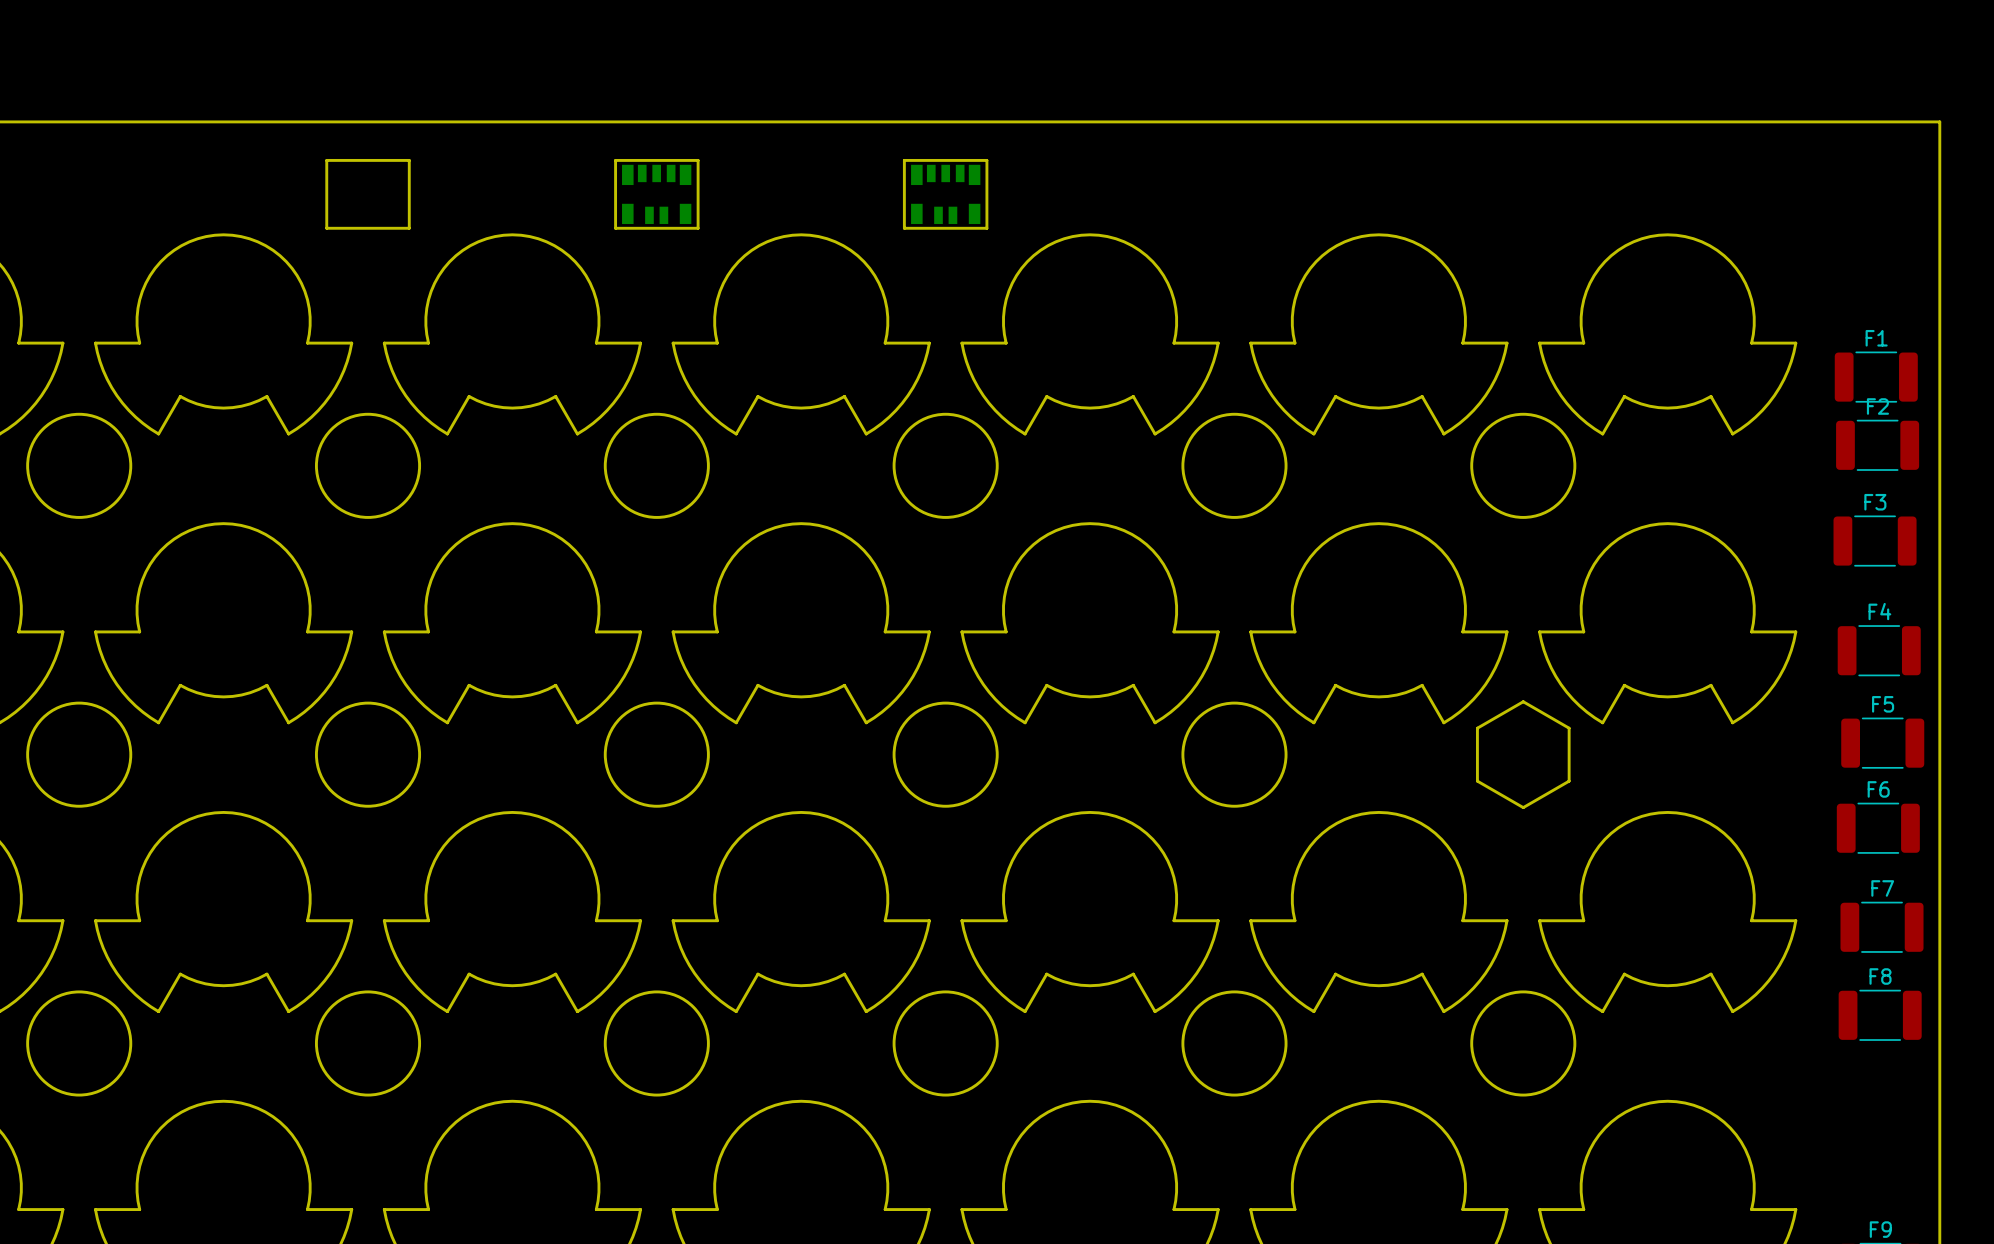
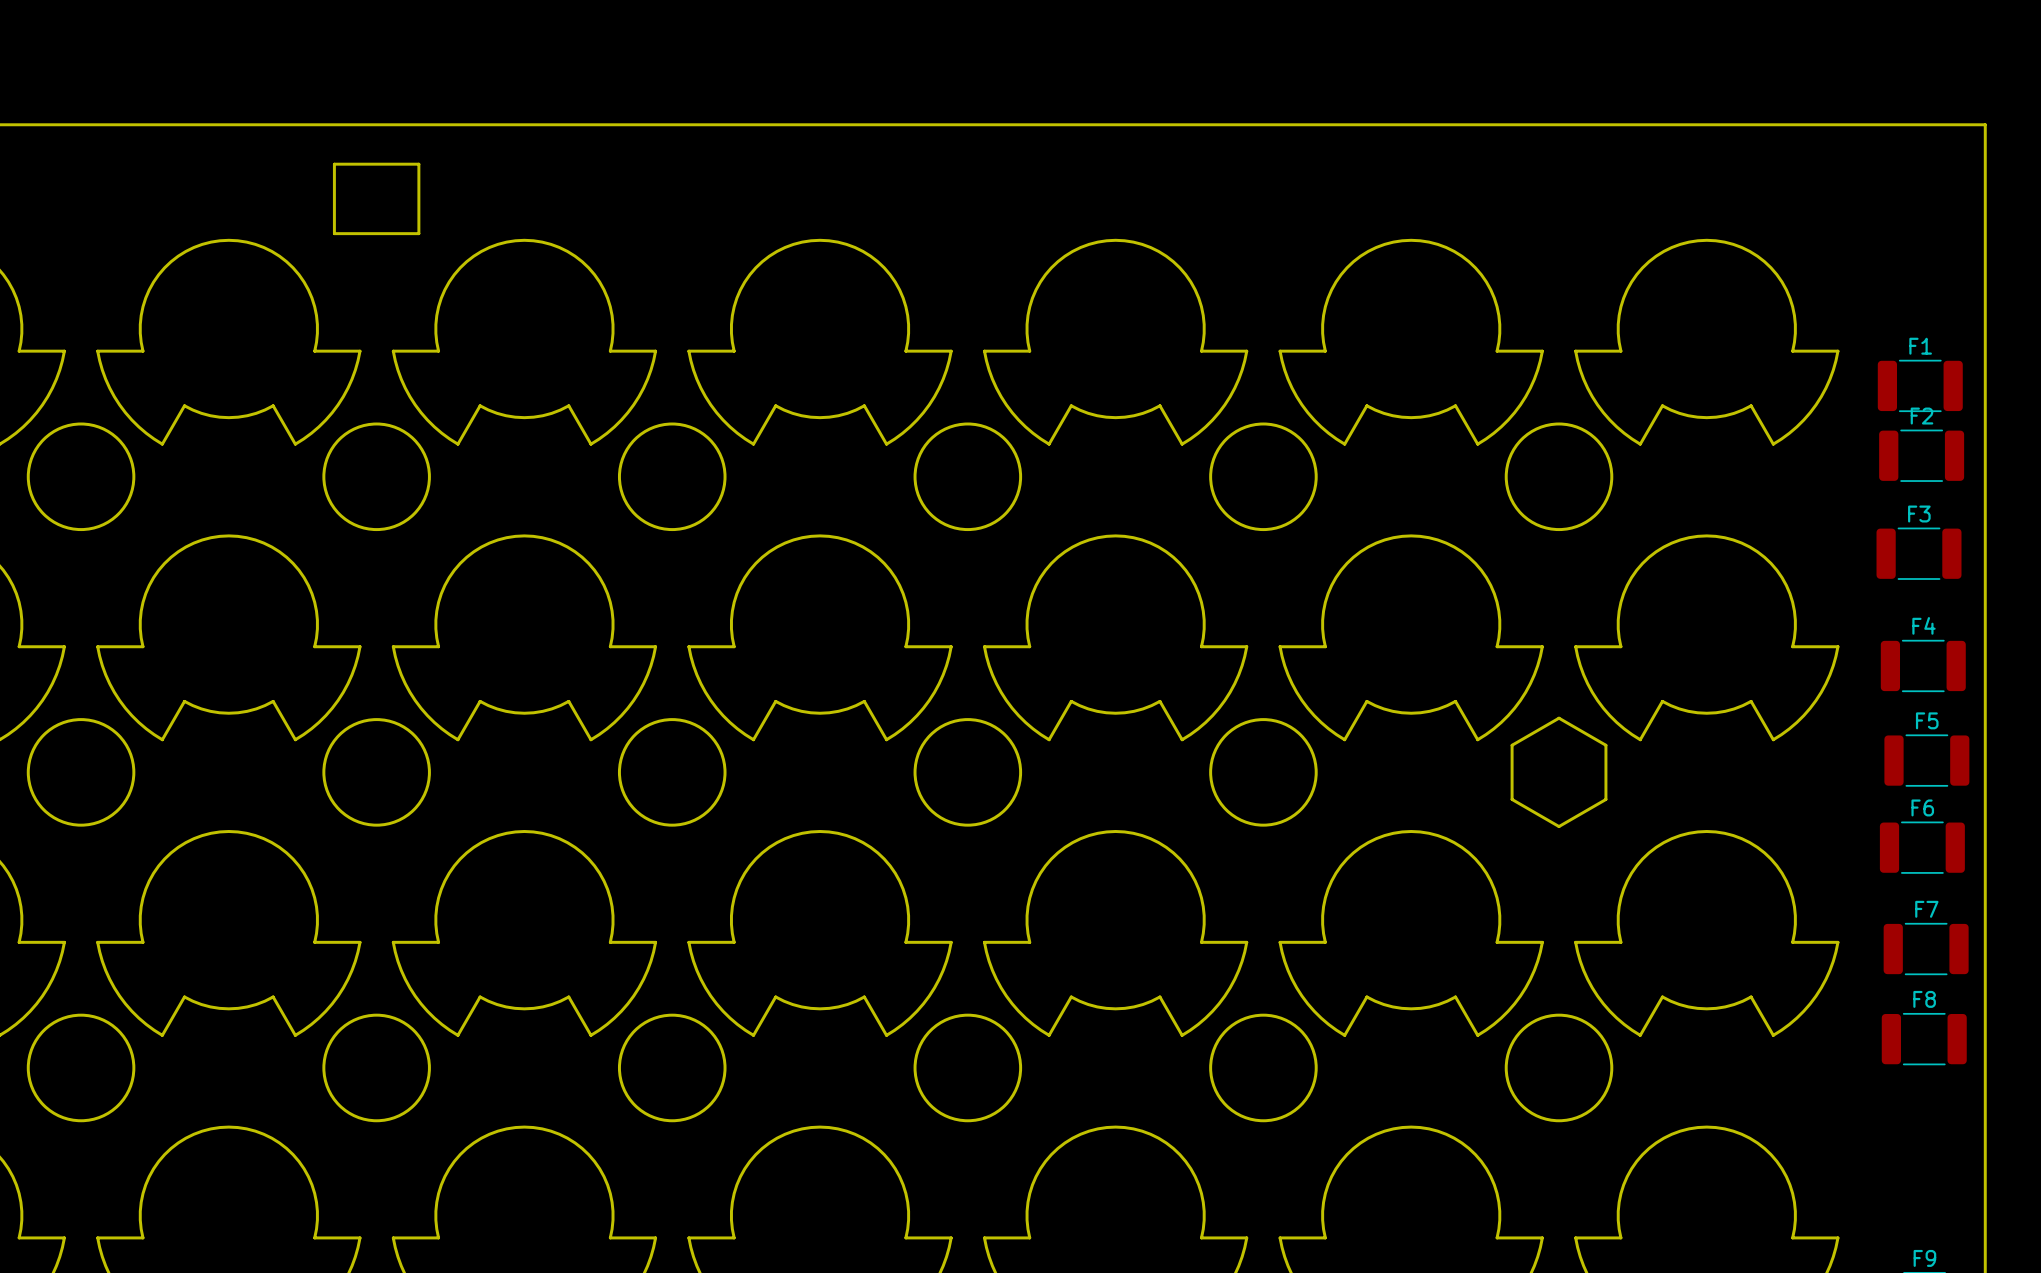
board edge: (615, 160) (698, 160) (698, 228) (615, 228) (615, 160) -> none
board edge: (904, 160) (904, 228) (986, 228) (986, 160) (904, 160) -> none
part: (656, 194) -> none
part: (945, 194) -> none

